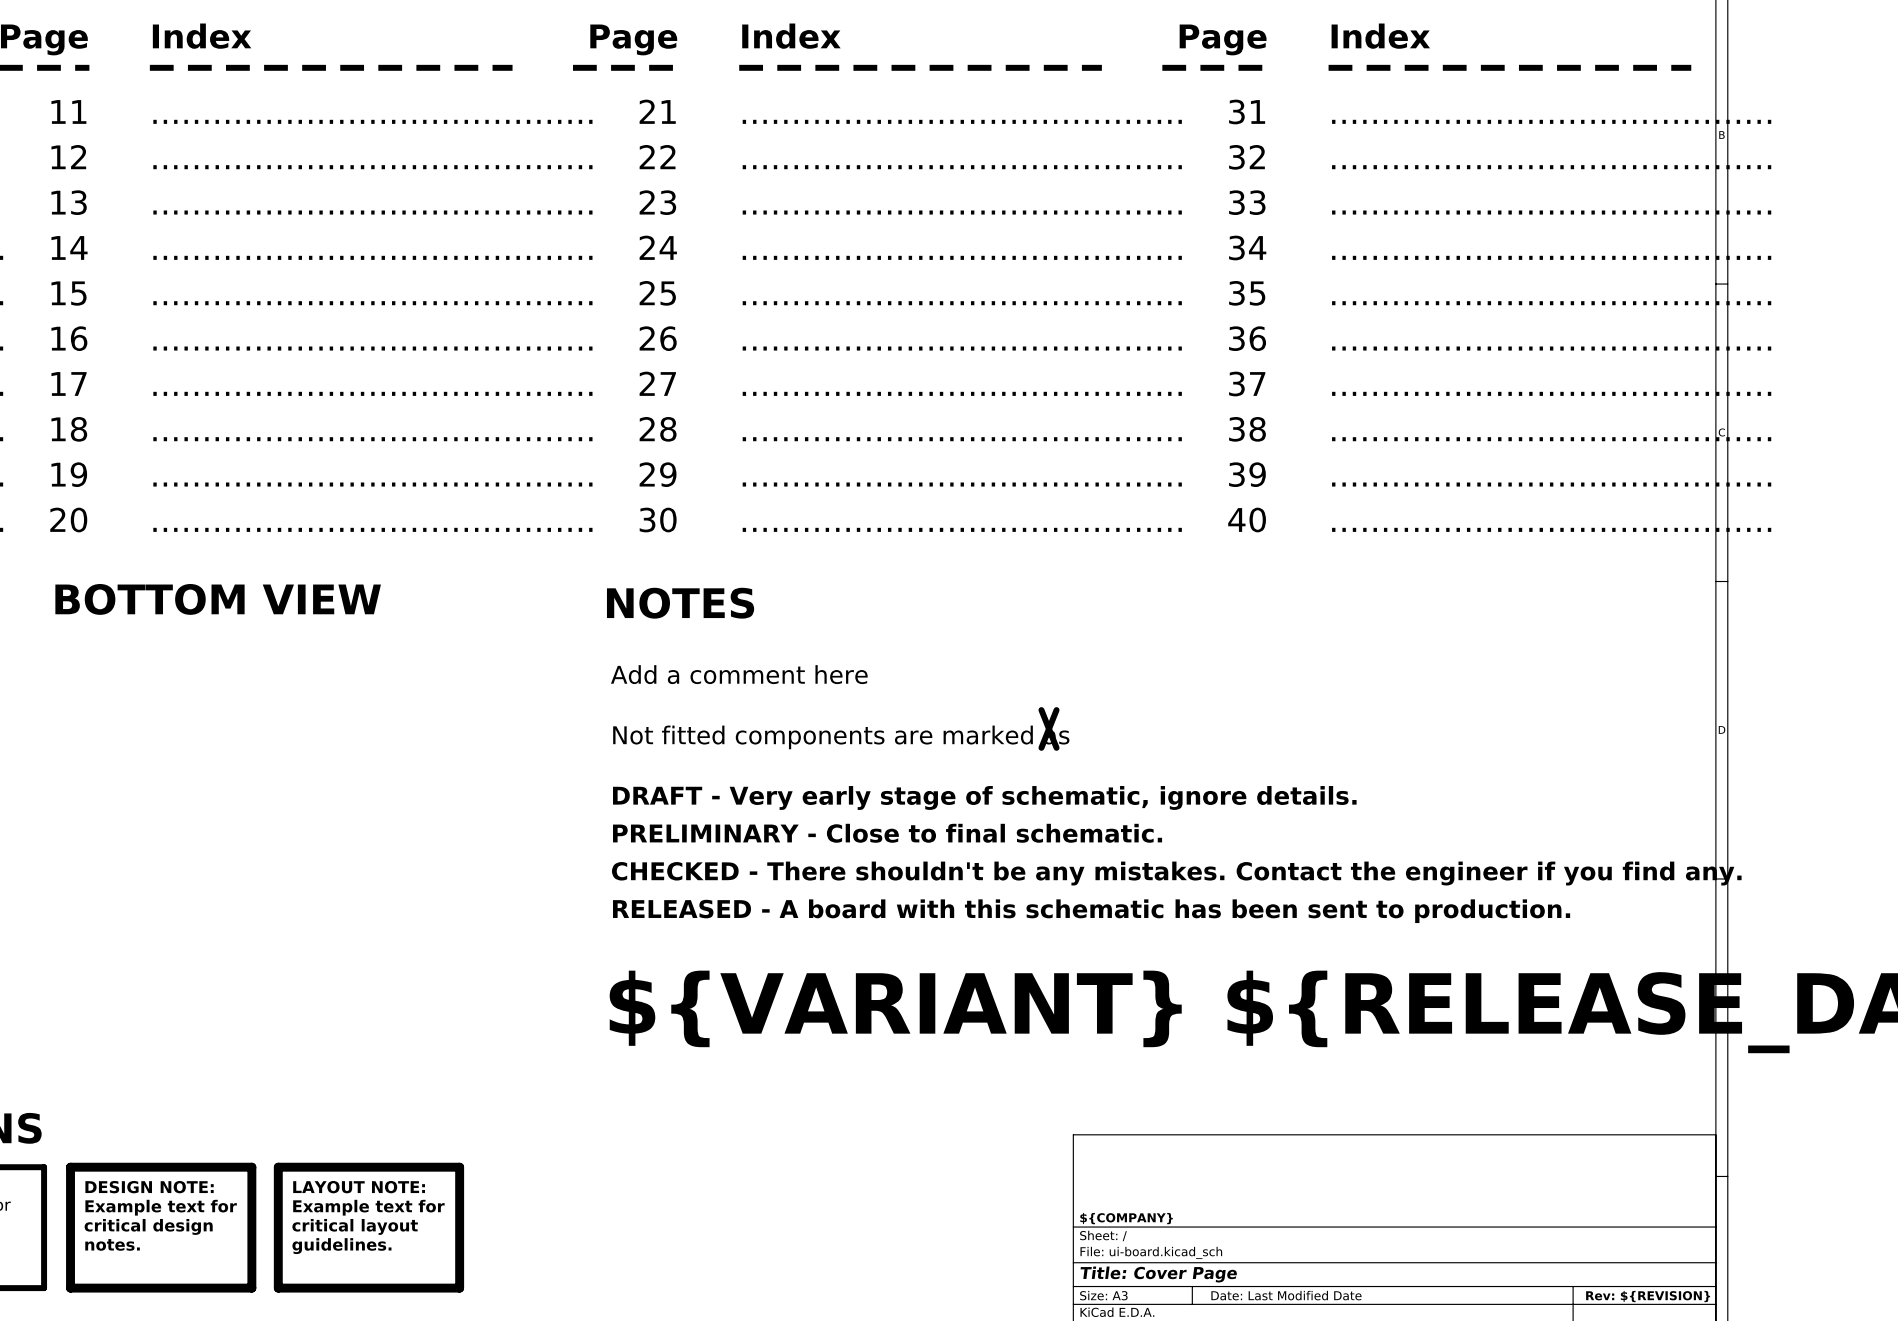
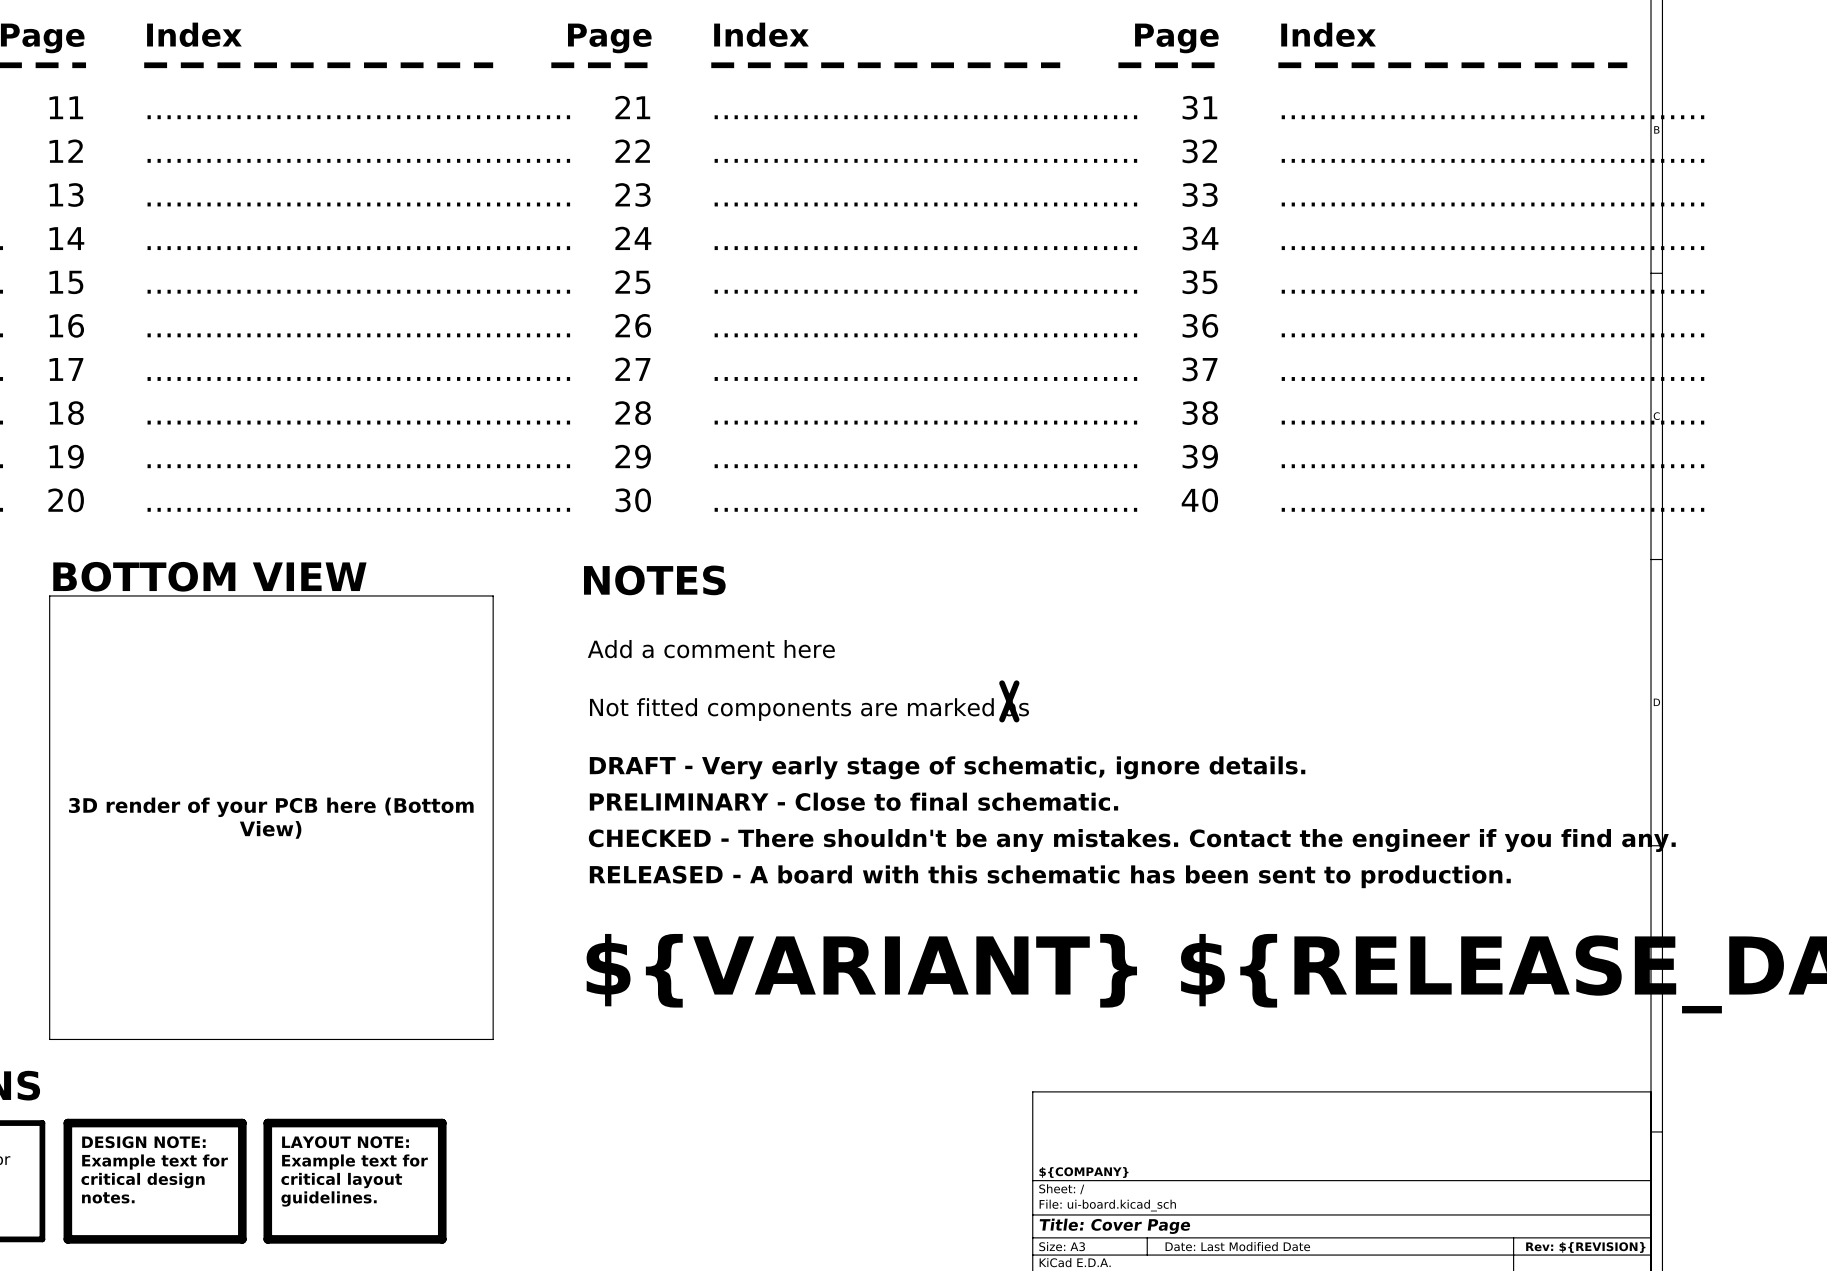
line: none -> (49, 595) (493, 595) (493, 1039) (49, 1039) (49, 595)
text: none -> 3D render of your PCB here (Bottom (271, 807)
text: none -> View) (270, 829)

